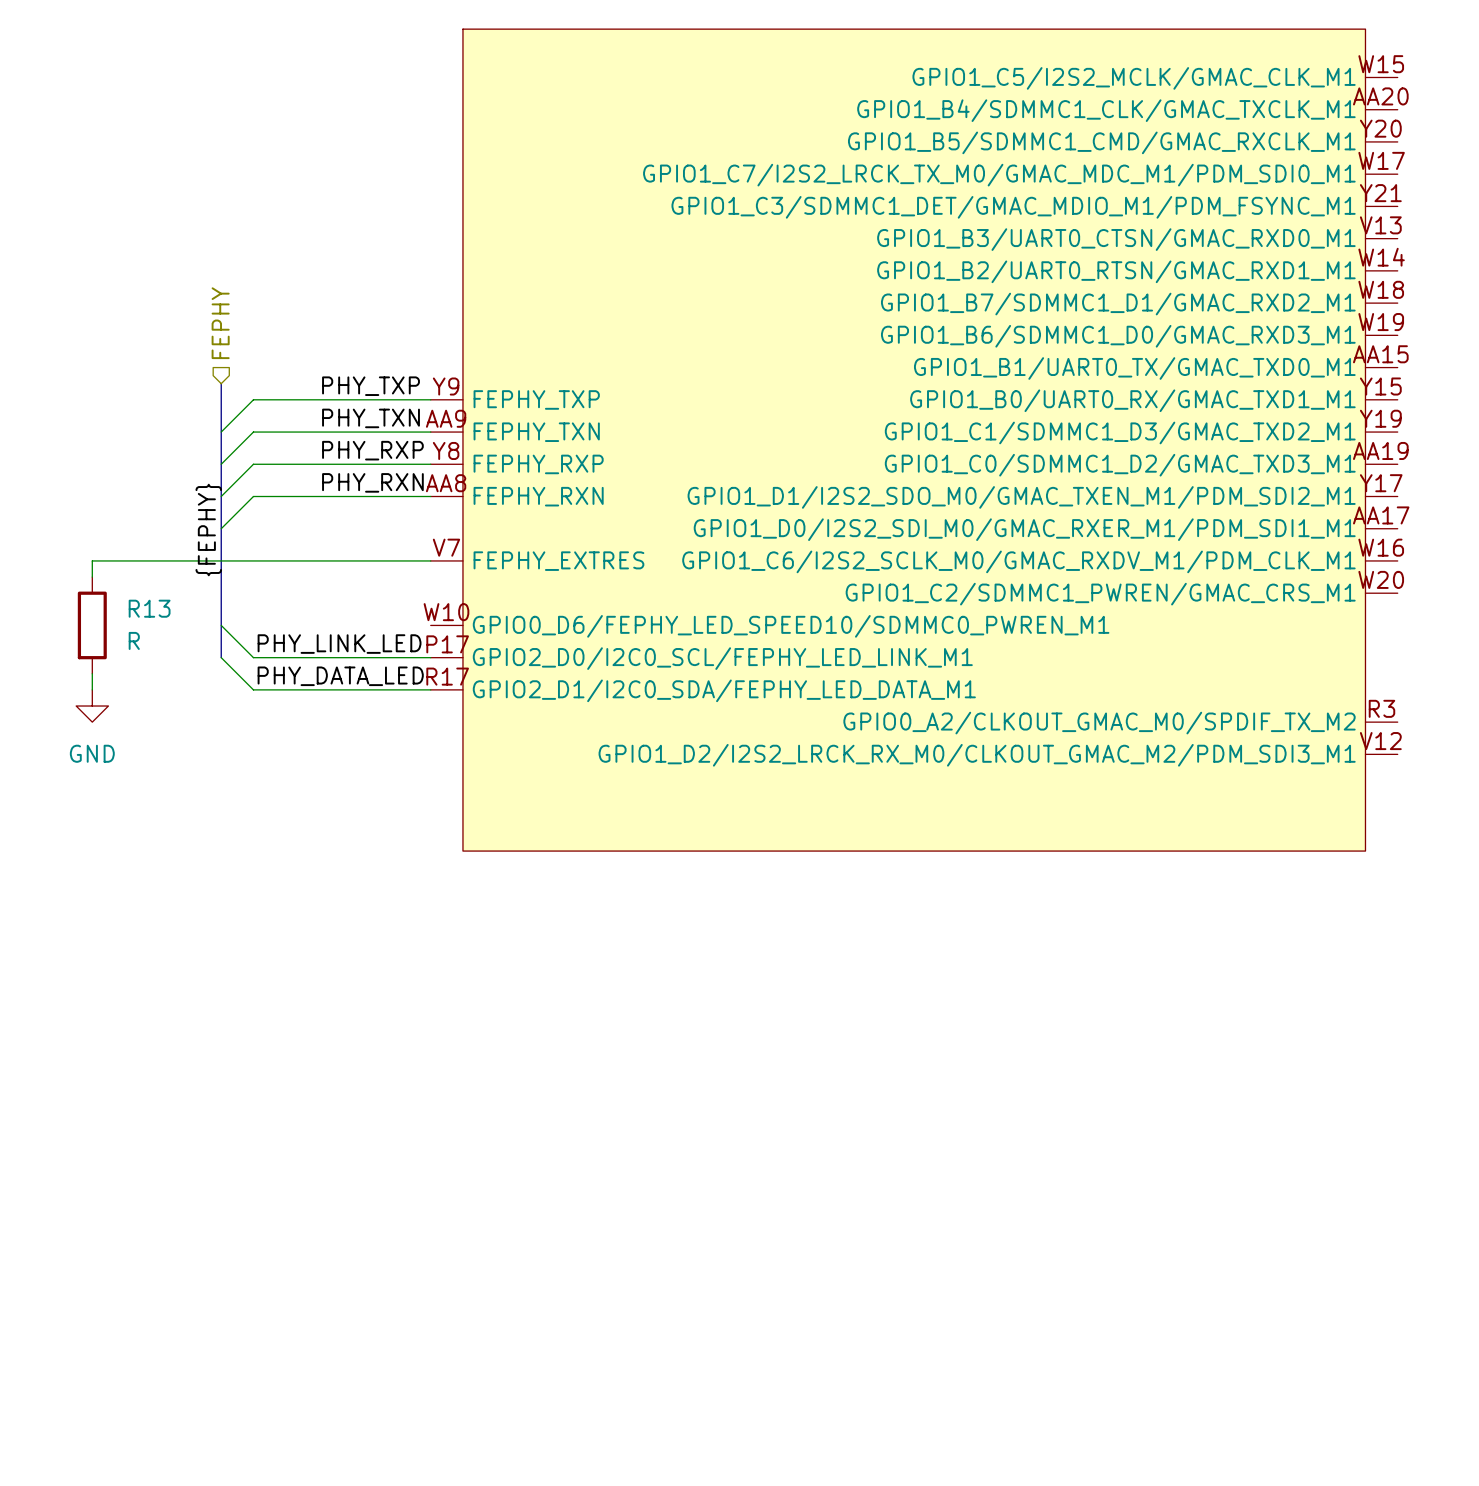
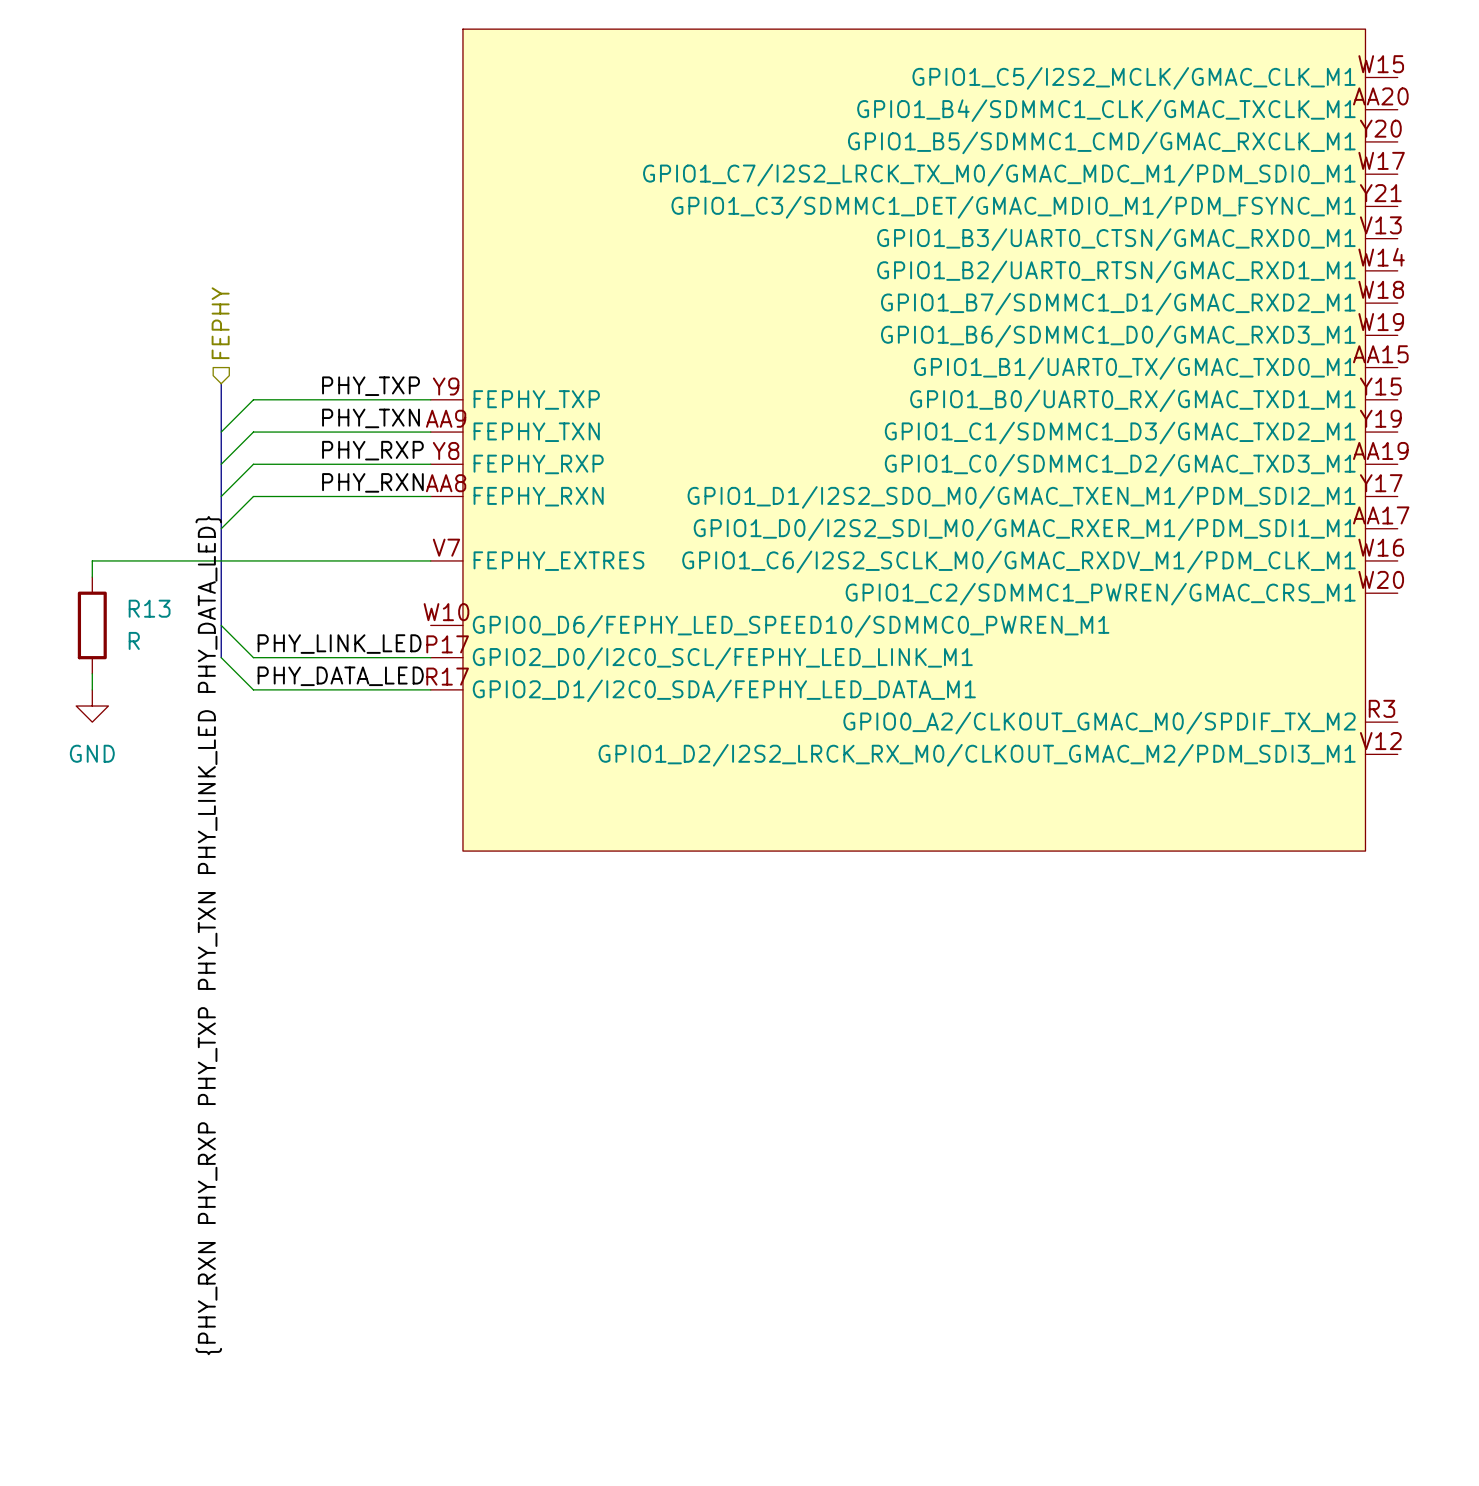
label: {FEPHY} (208, 530) -> none
label: none -> {PHY_RXN PHY_RXP PHY_TXP PHY_TXN PHY_LINK_LED PHY_DATA_LED} (208, 935)

